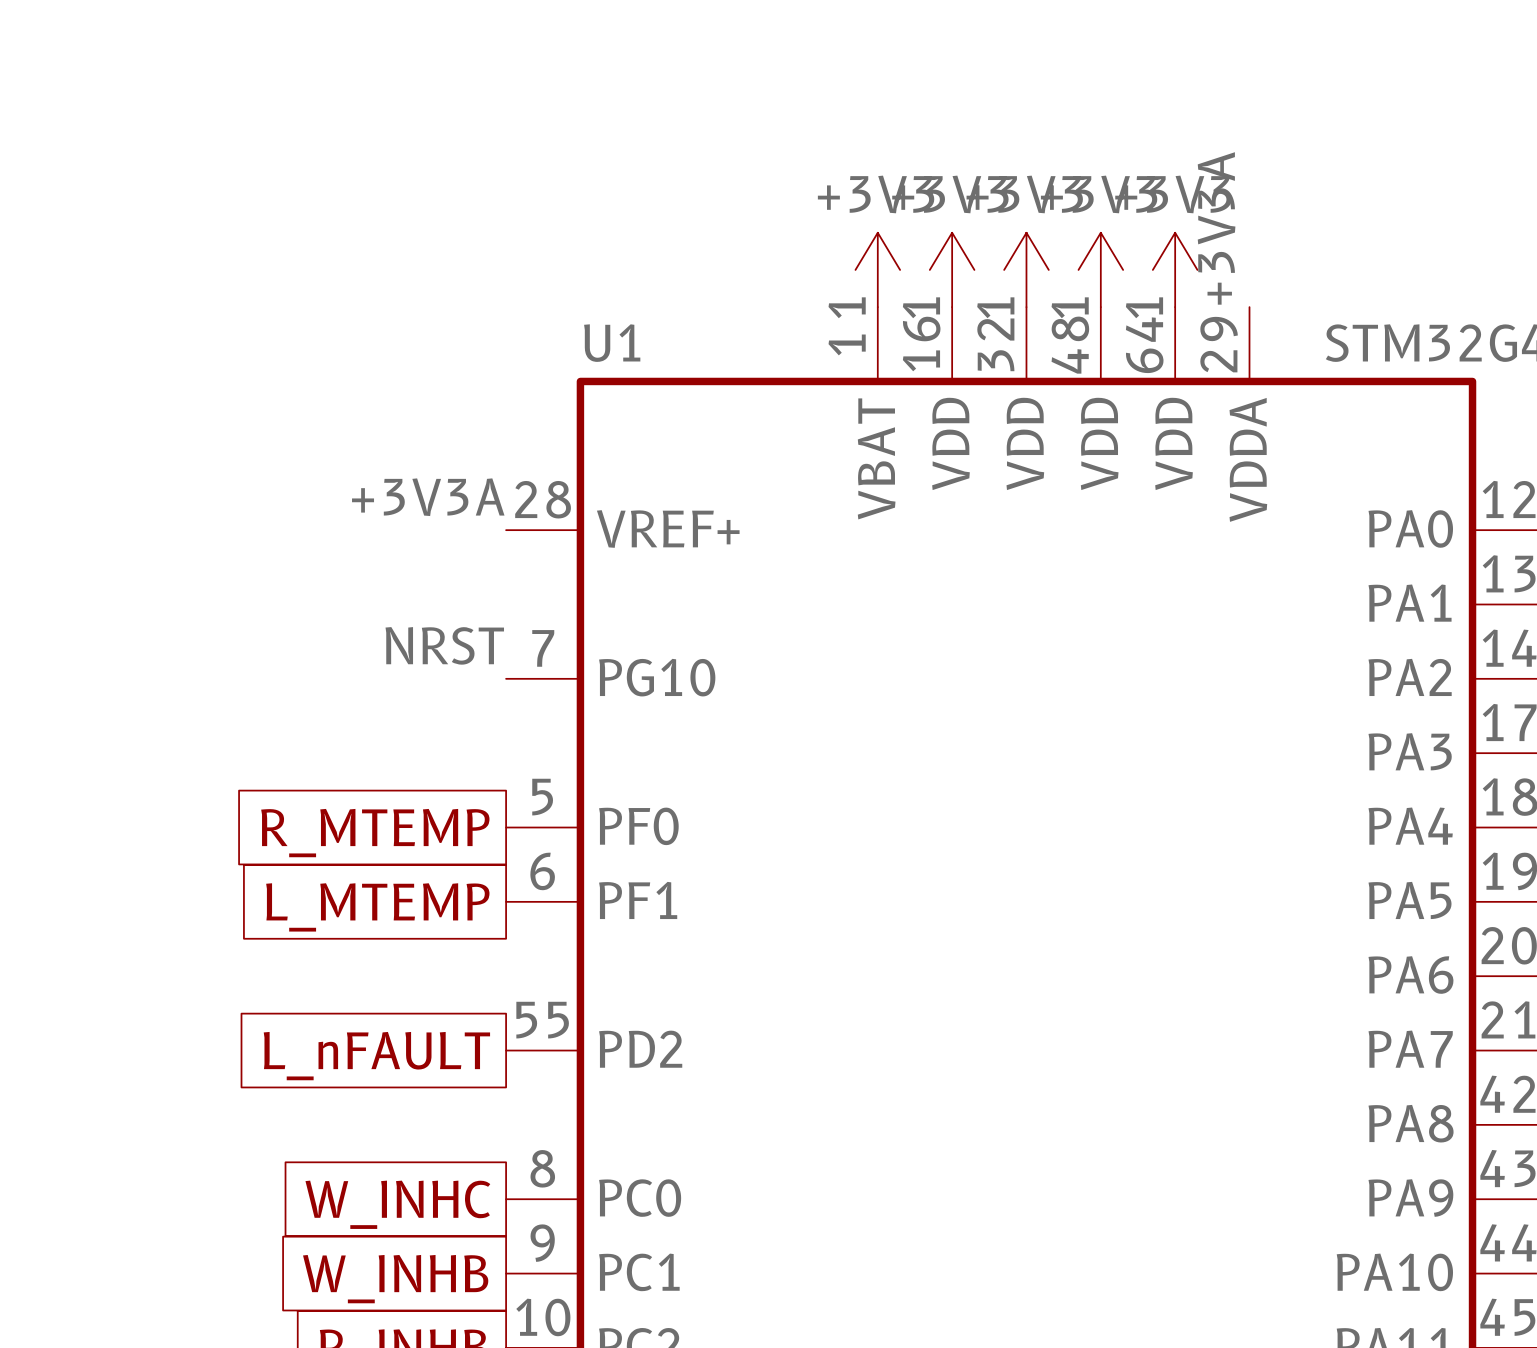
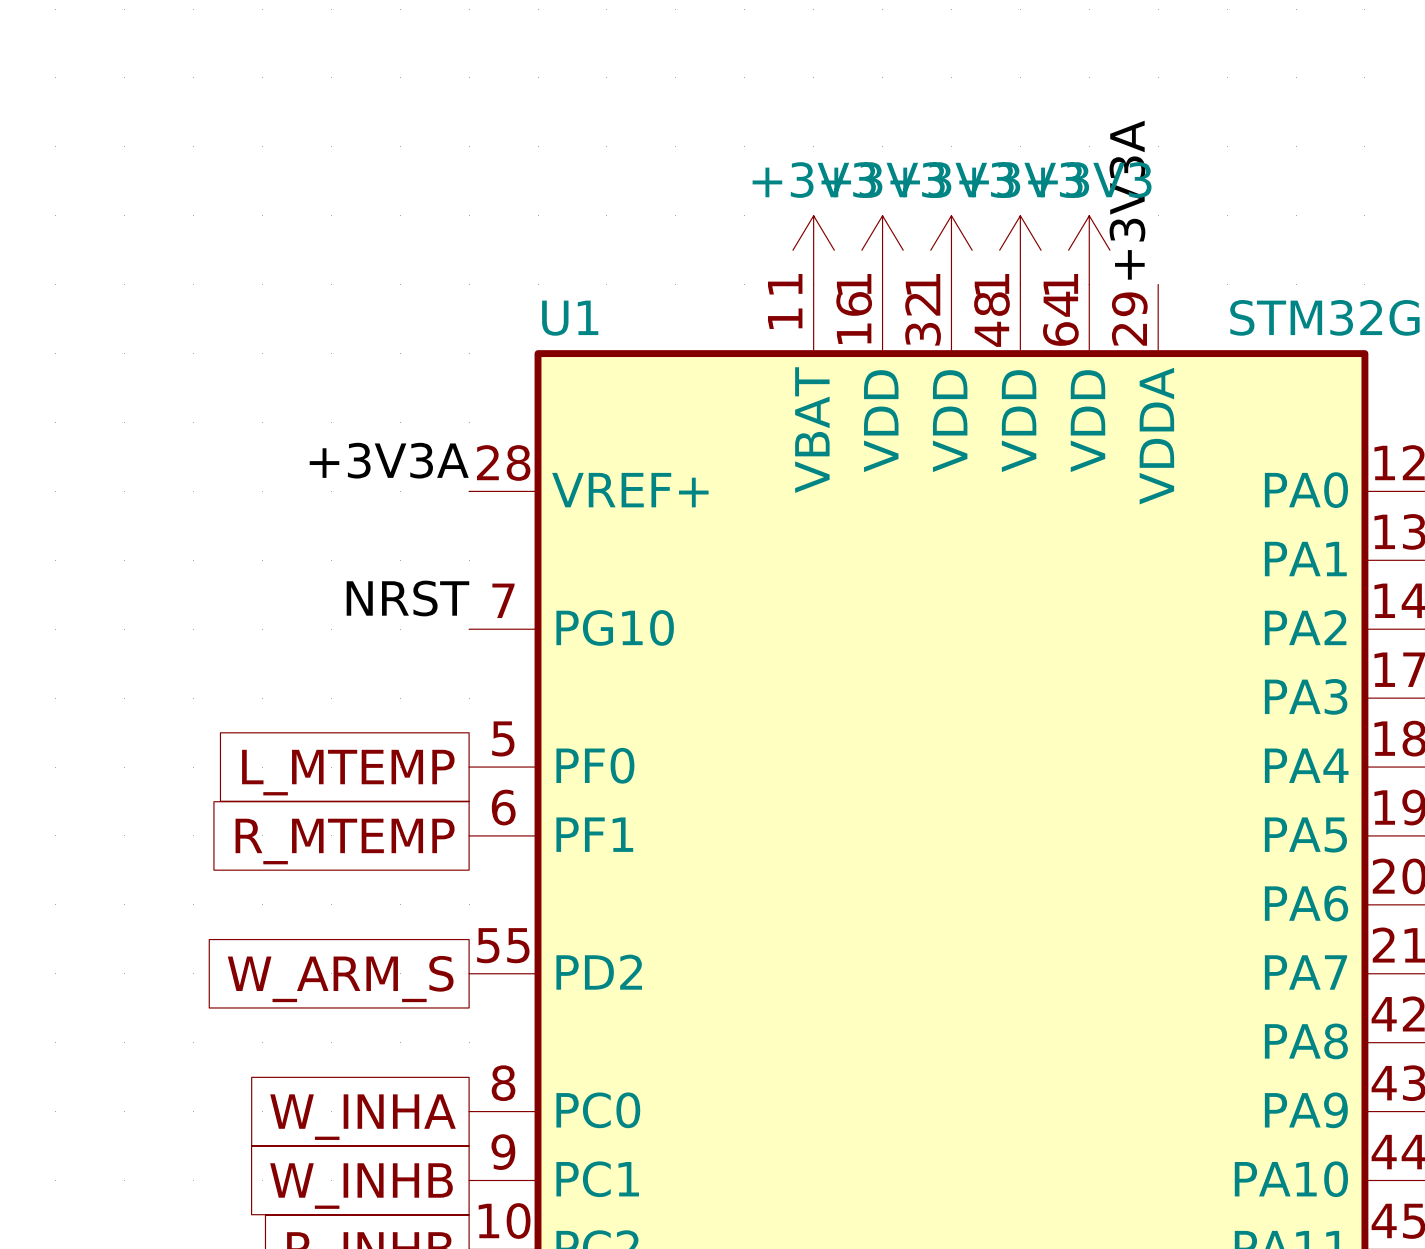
global label: R_MTEMP (375, 833) -> L_MTEMP (348, 772)
global label: L_MTEMP (377, 907) -> R_MTEMP (345, 841)
global label: L_nFAULT (376, 1056) -> W_ARM_S (340, 979)
global label: W_INHC (397, 1204) -> W_INHA (363, 1117)

